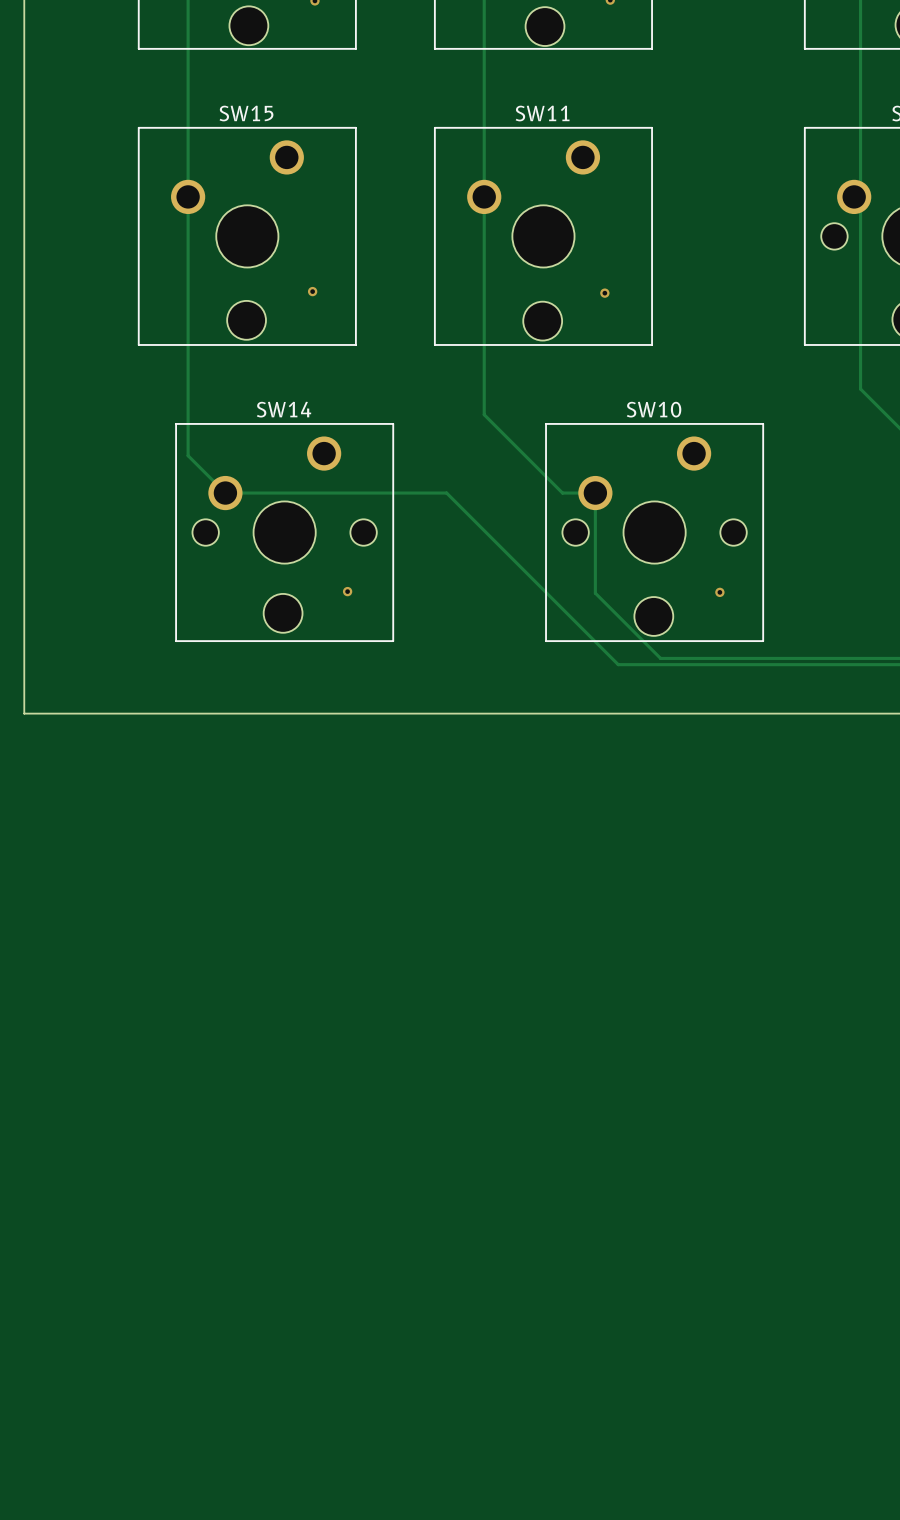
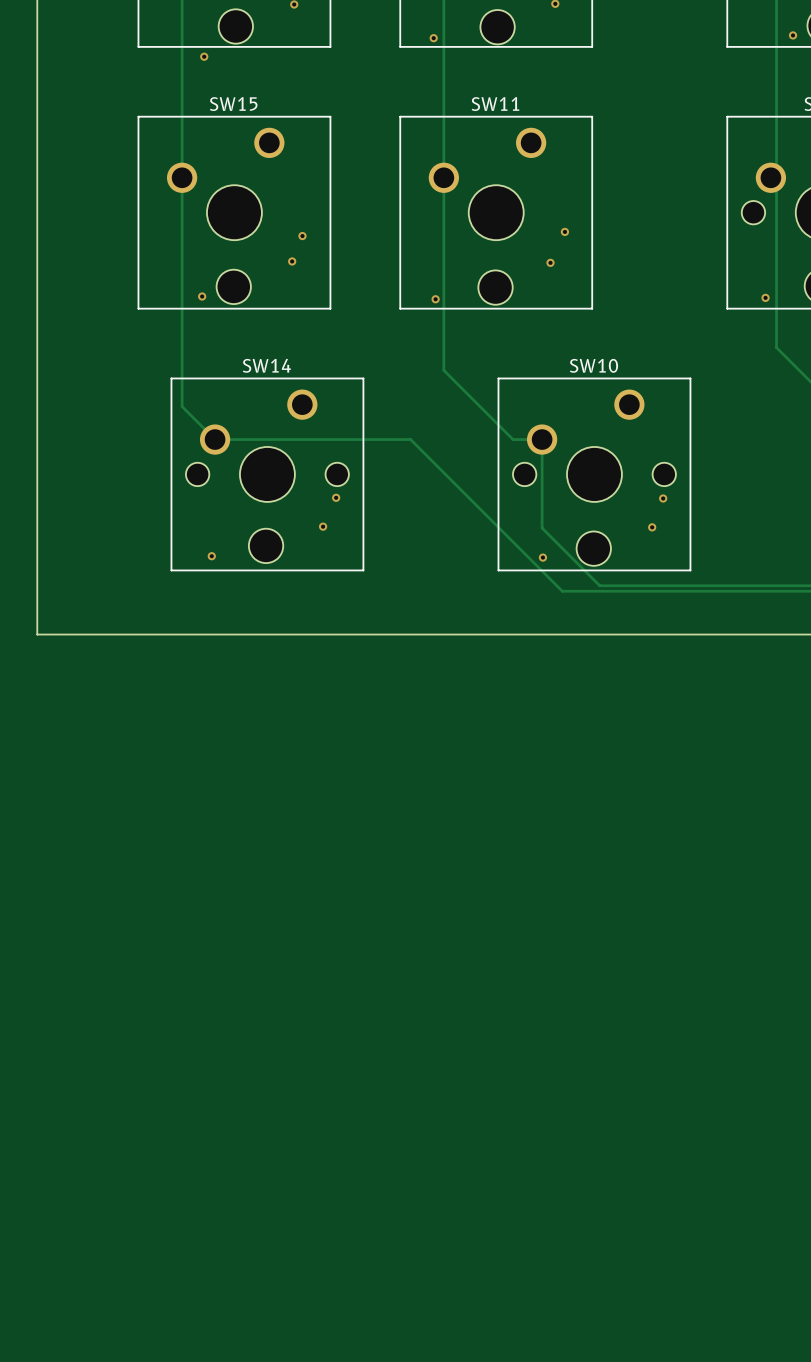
via: none -> (793, 35)
via: none -> (433, 38)
via: none -> (204, 56)
via: none -> (564, 231)
via: none -> (302, 236)
via: none -> (202, 296)
via: none -> (765, 297)
via: none -> (435, 299)
via: none -> (336, 497)
via: none -> (663, 498)
via: none -> (211, 556)
via: none -> (542, 557)

